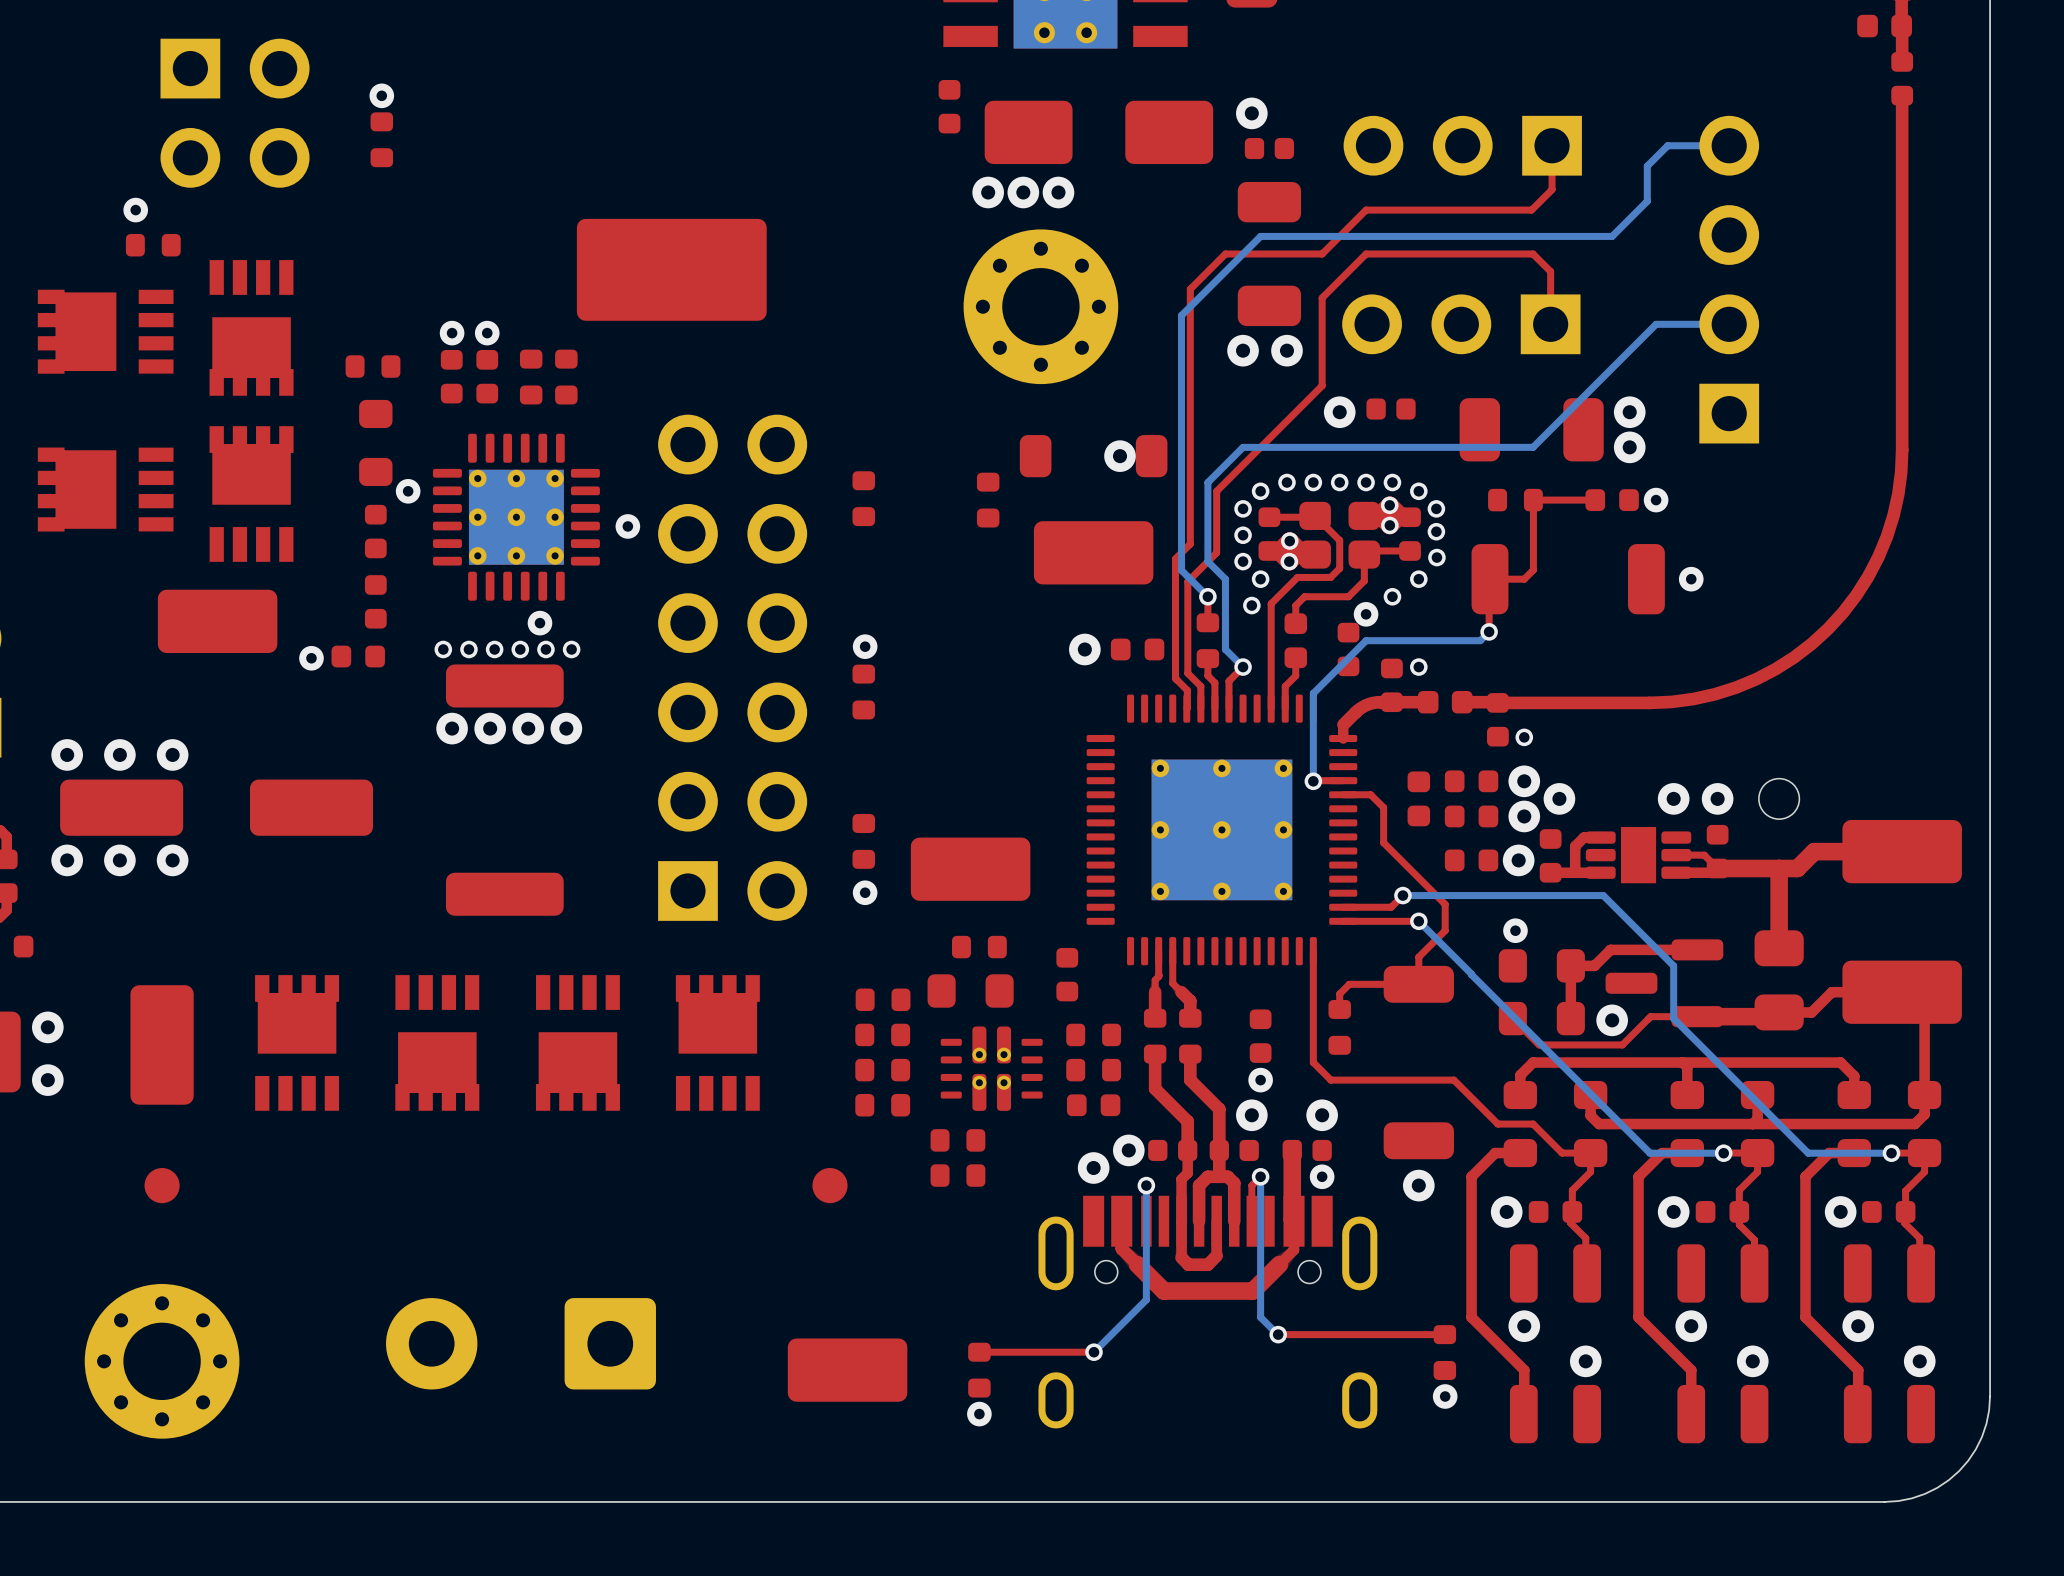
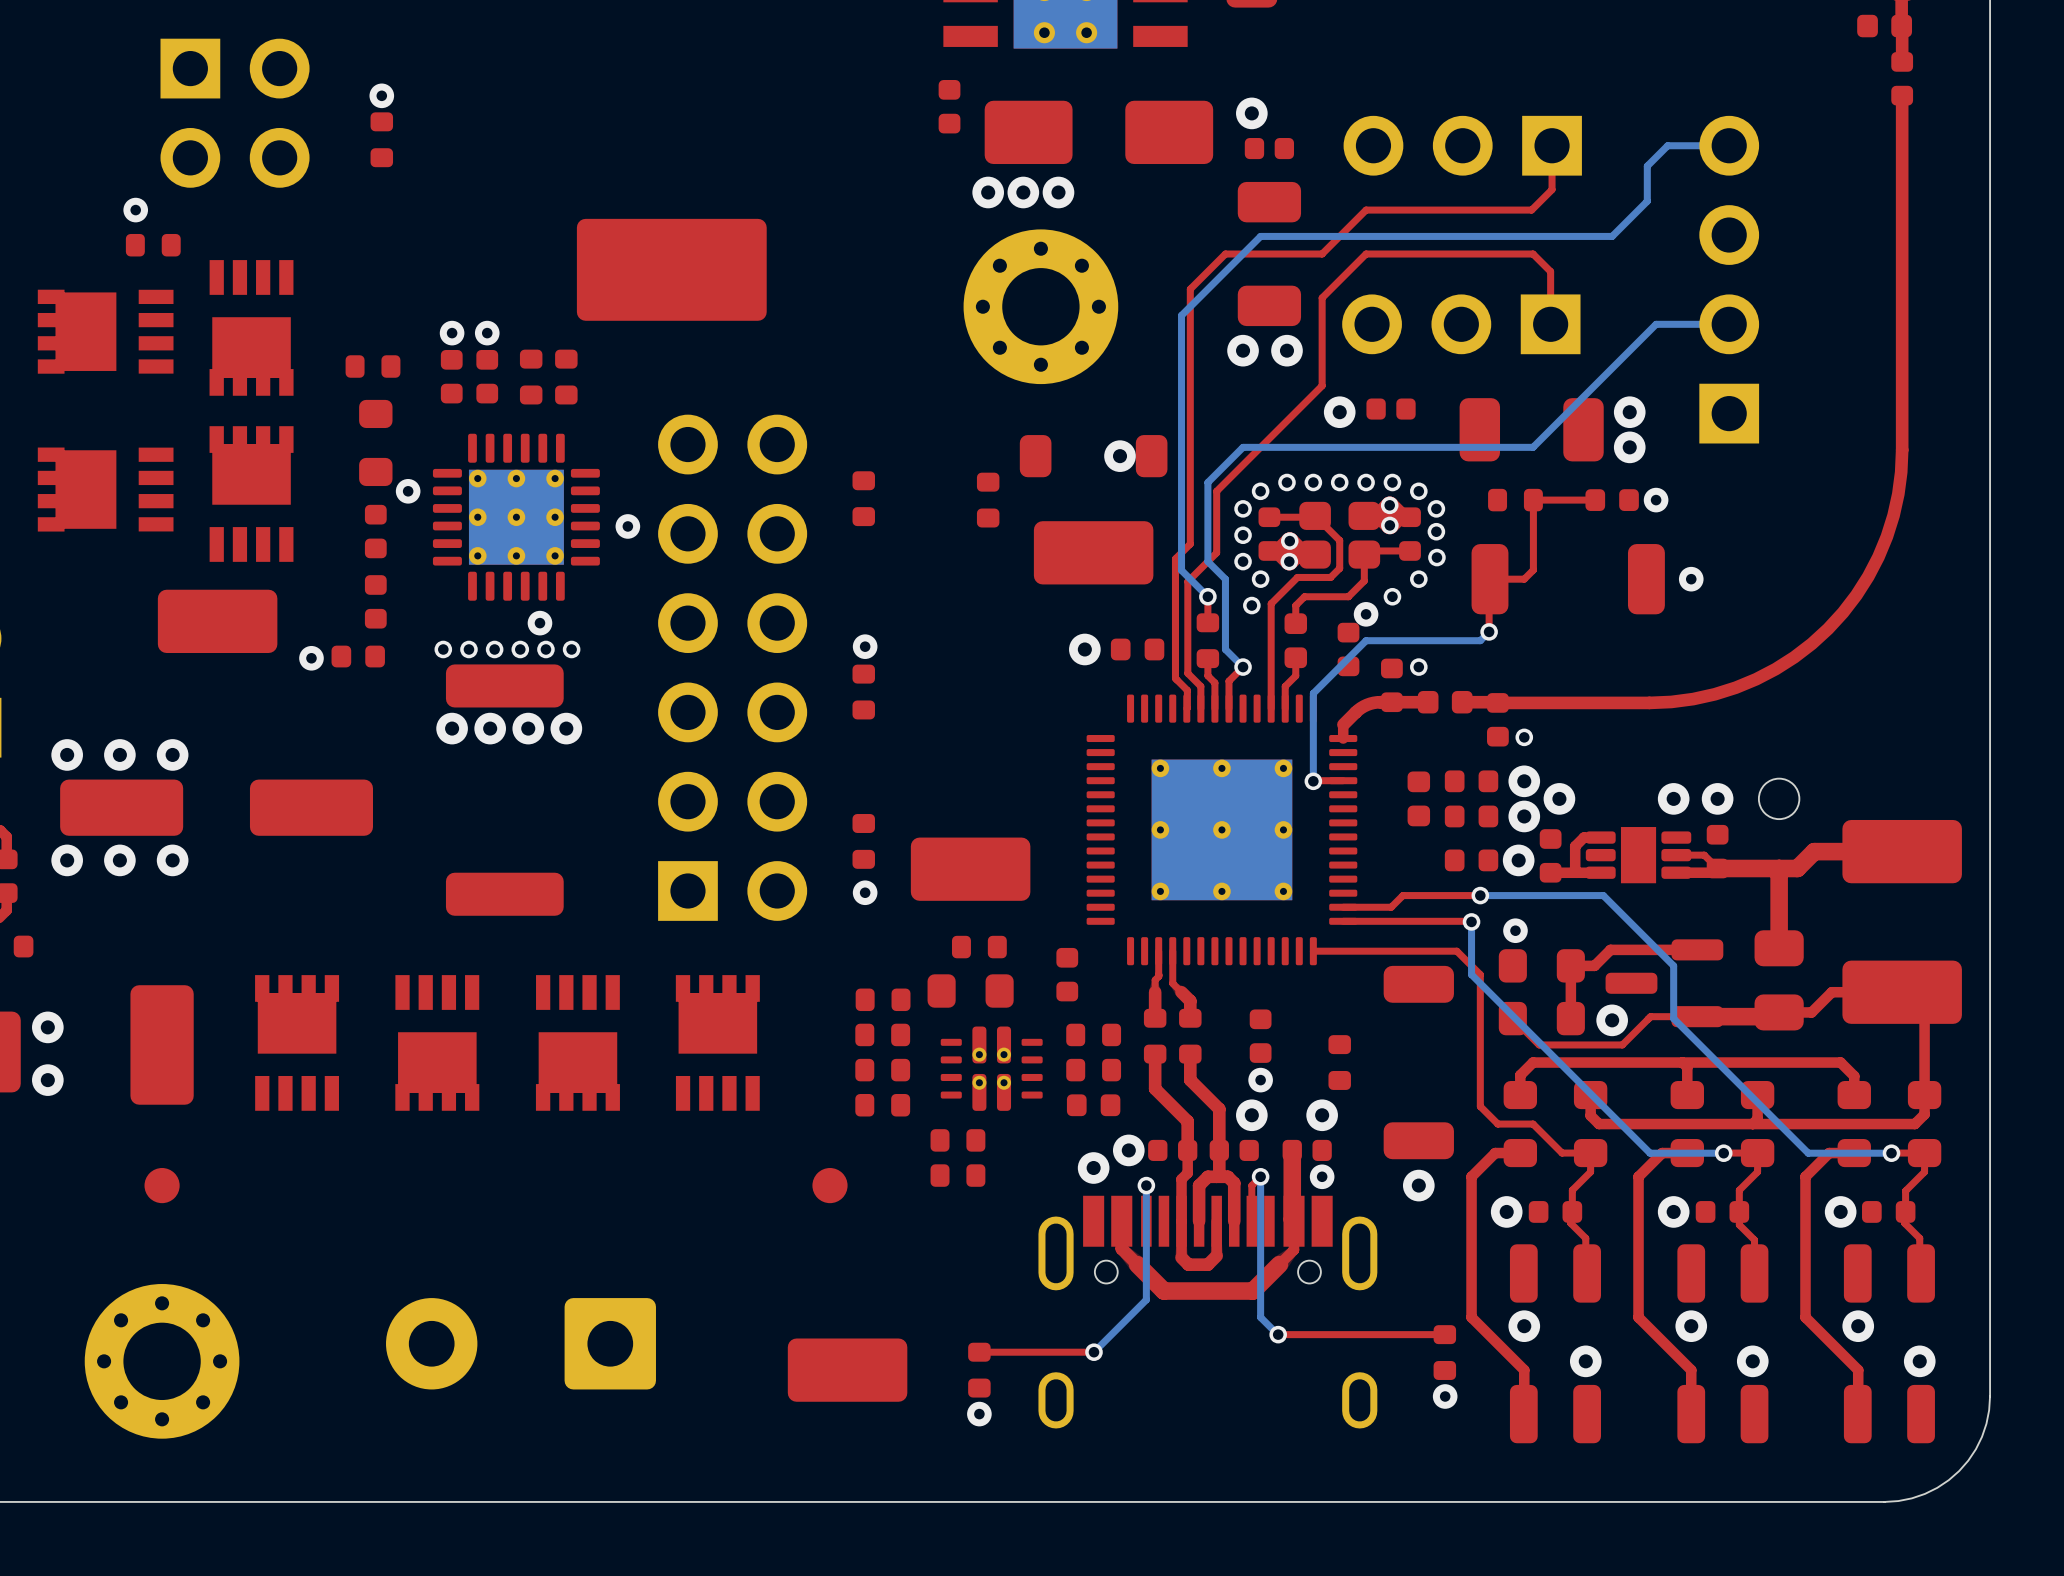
top track: (1343, 794) (1370, 794) (1383, 807) (1383, 842) (1445, 904) (1445, 930) (1418, 957) (1418, 984) (1349, 984) (1339, 993) (1339, 1009) -> none
via: (1402, 895) -> none
top track: none -> (1480, 895) (1402, 895)
bottom track: (1480, 895) (1402, 895) -> none
via: none -> (1480, 895)
top track: none -> (1418, 921) (1471, 921)
bottom track: (1418, 921) (1471, 974) -> (1471, 921) (1471, 974)
via: (1418, 921) -> none
via: none -> (1471, 921)
top track: (1313, 951) (1313, 1062) (1330, 1080) (1453, 1080) (1480, 1106) -> (1313, 951) (1456, 951) (1480, 974) (1480, 1106)
part position: (1339, 1027) -> (1339, 1062)

